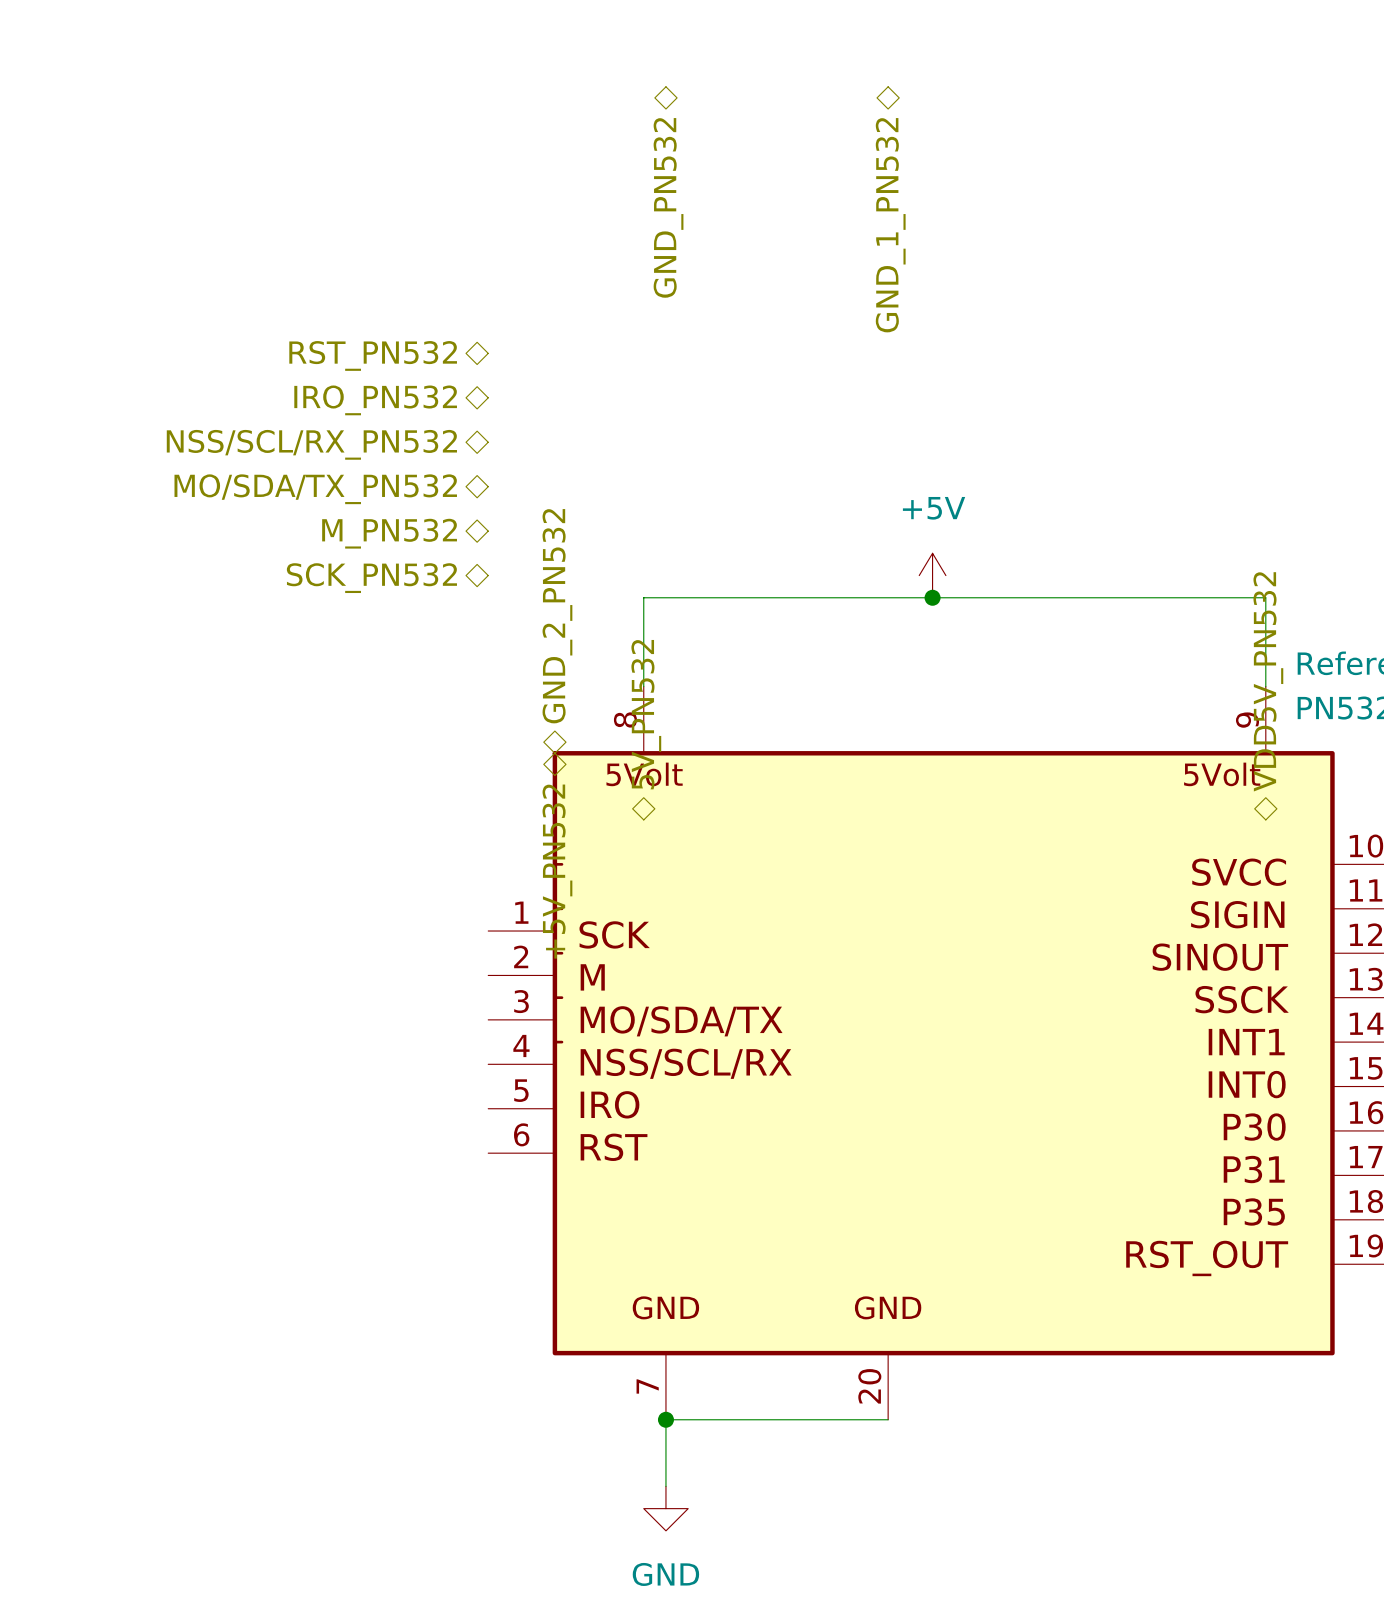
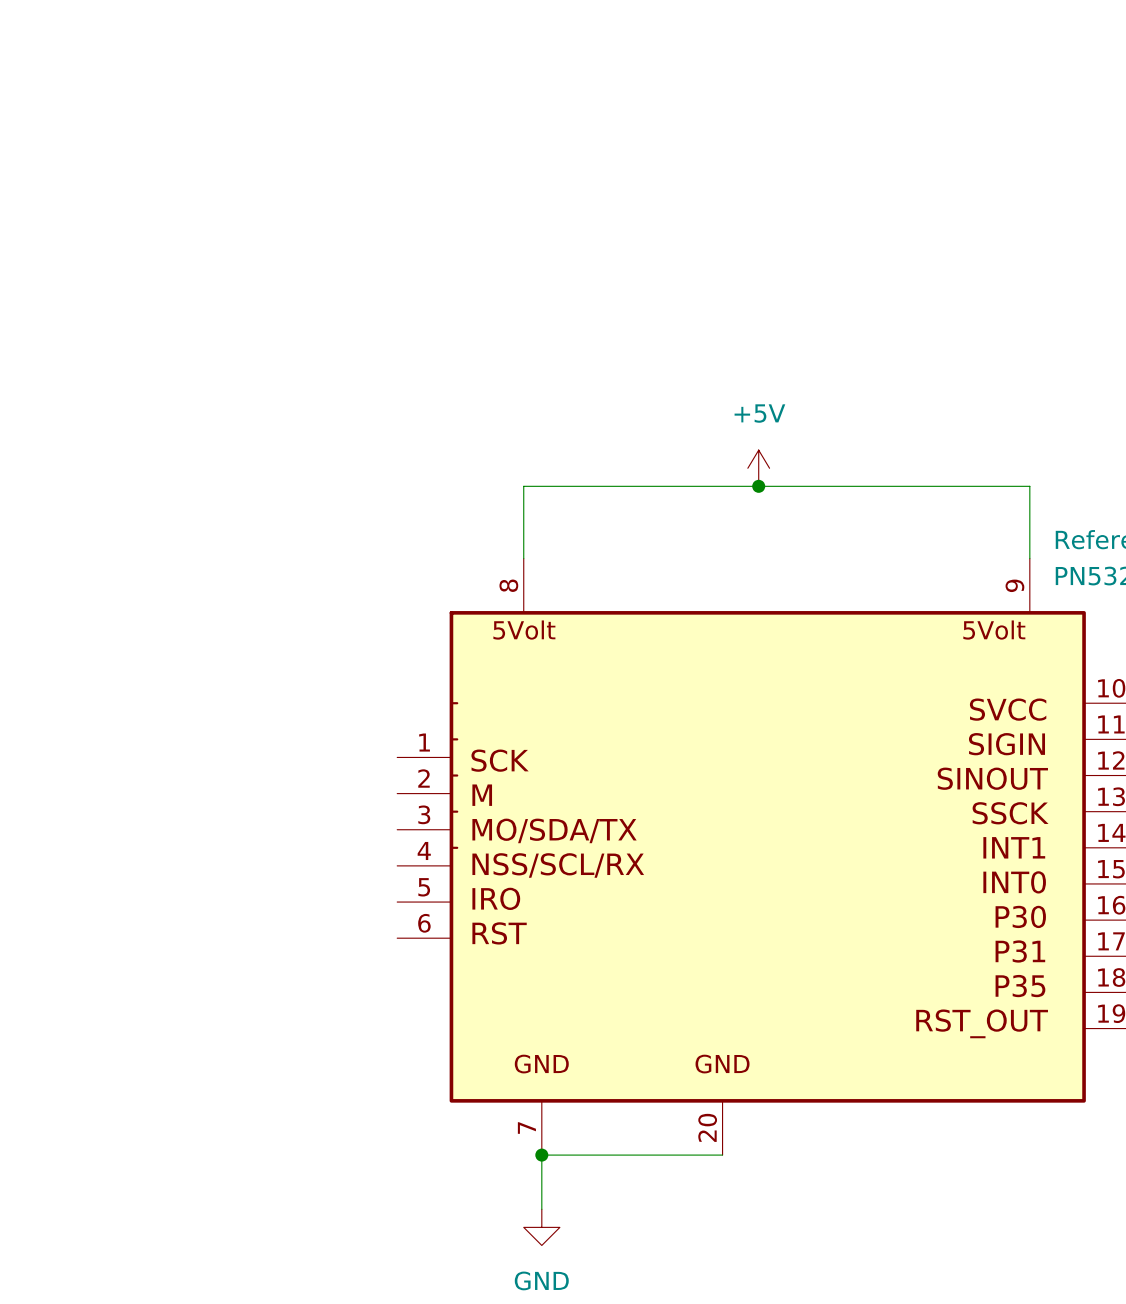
hierarchical label: GND_PN532 (668, 207) -> none
hierarchical label: GND_1_PN532 (890, 225) -> none
hierarchical label: RST_PN532 (373, 355) -> none
hierarchical label: IRO_PN532 (375, 400) -> none
hierarchical label: NSS/SCL/RX_PN532 (311, 444) -> none
hierarchical label: MO/SDA/TX_PN532 (315, 489) -> none
hierarchical label: M_PN532 (389, 533) -> none
hierarchical label: SCK_PN532 (371, 578) -> none
hierarchical label: GND_2_PN532 (557, 616) -> none
hierarchical label: VDD5V_PN532 (1268, 681) -> none
hierarchical label: 5V_PN532 (646, 714) -> none
hierarchical label: +5V_PN532 (557, 871) -> none

